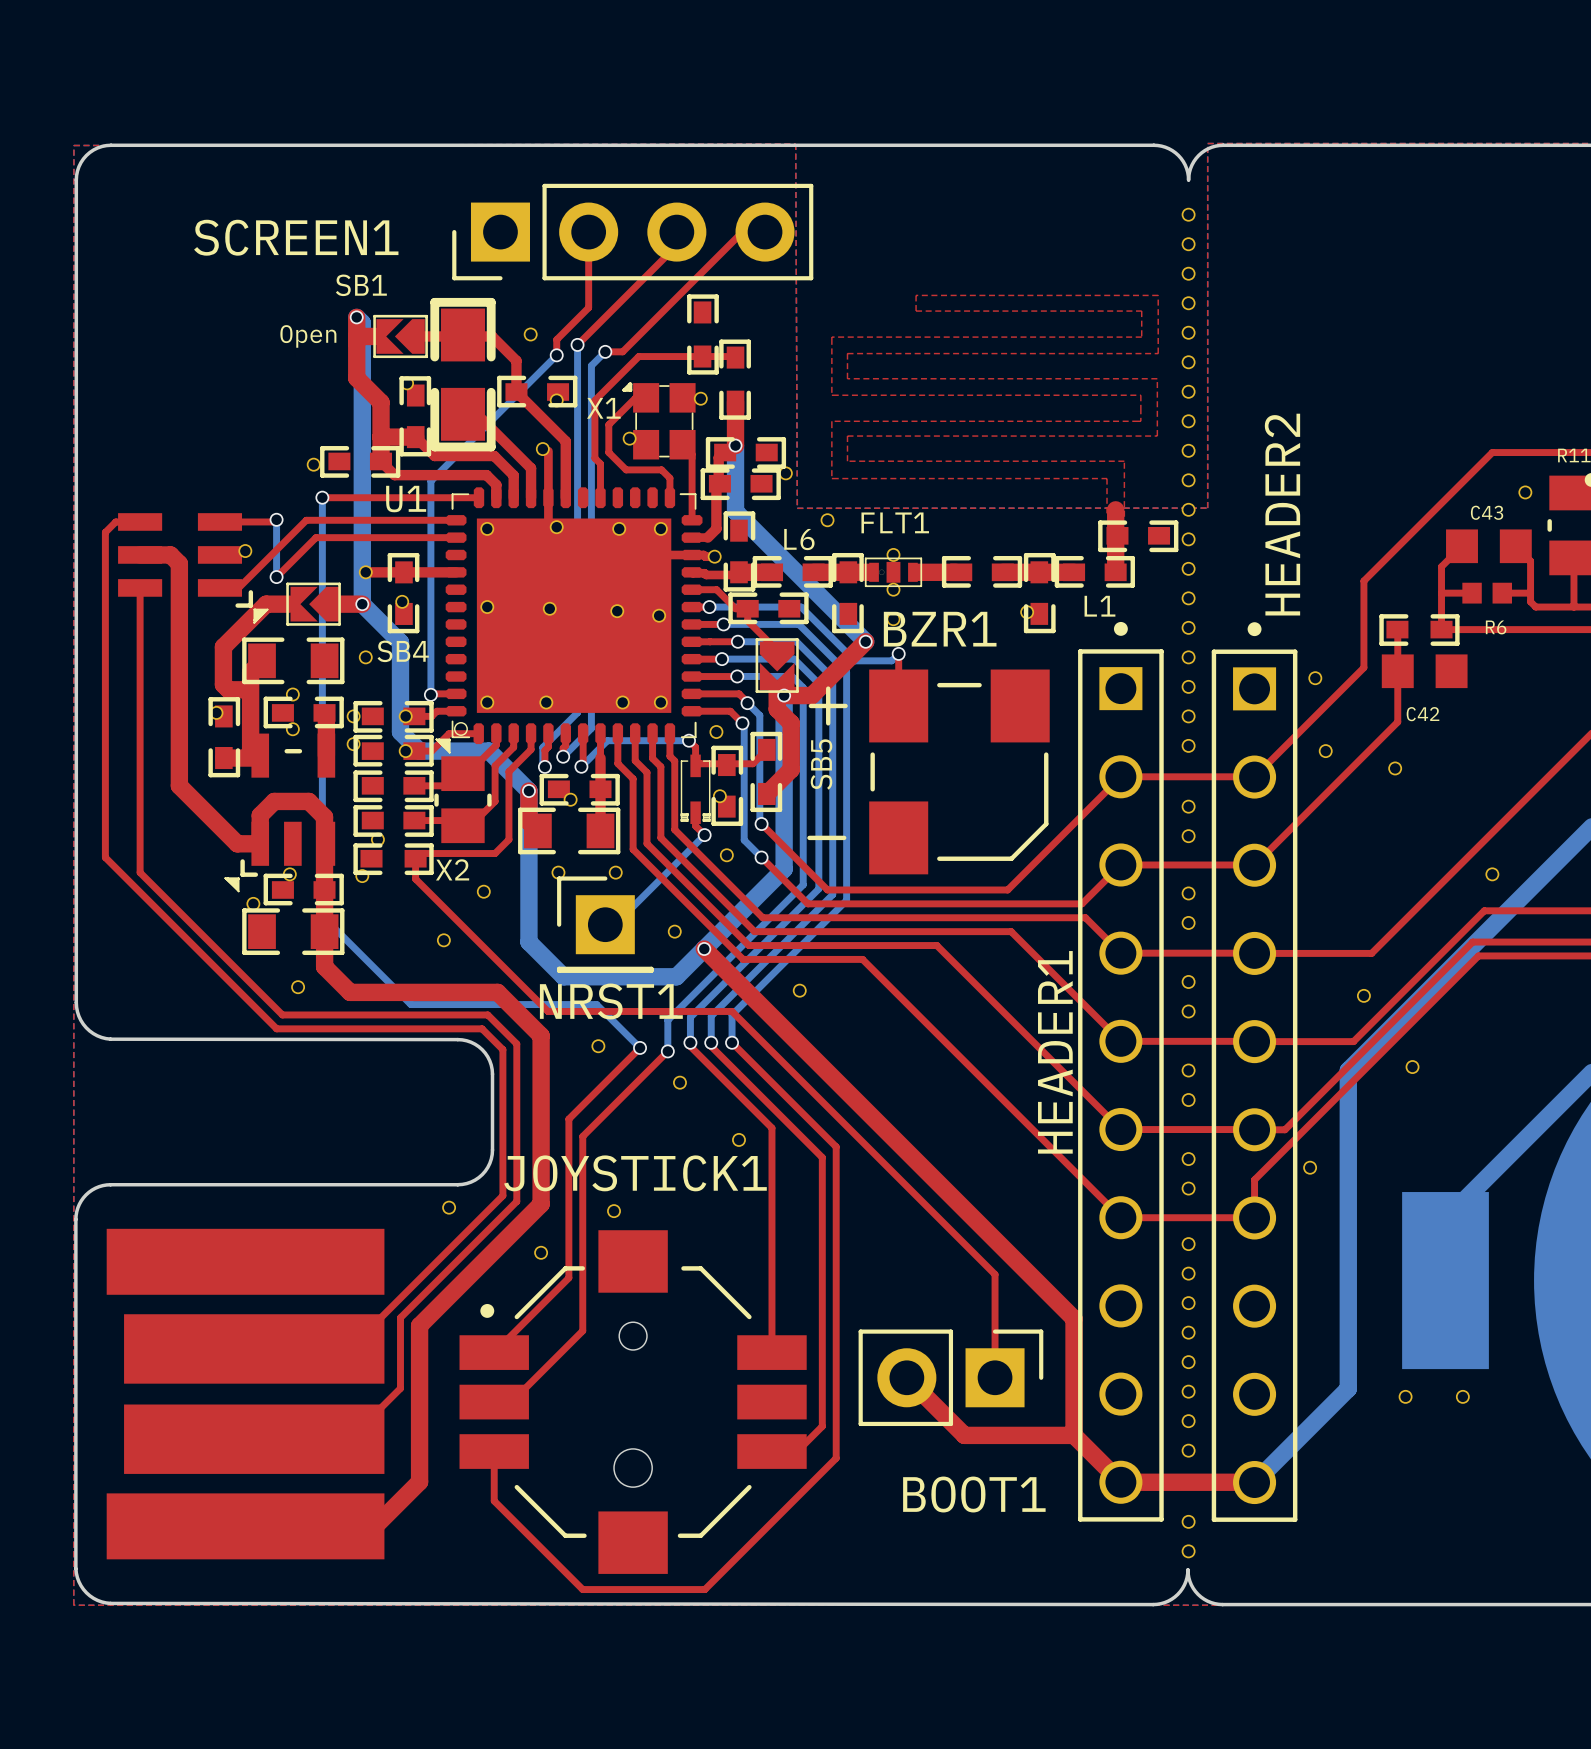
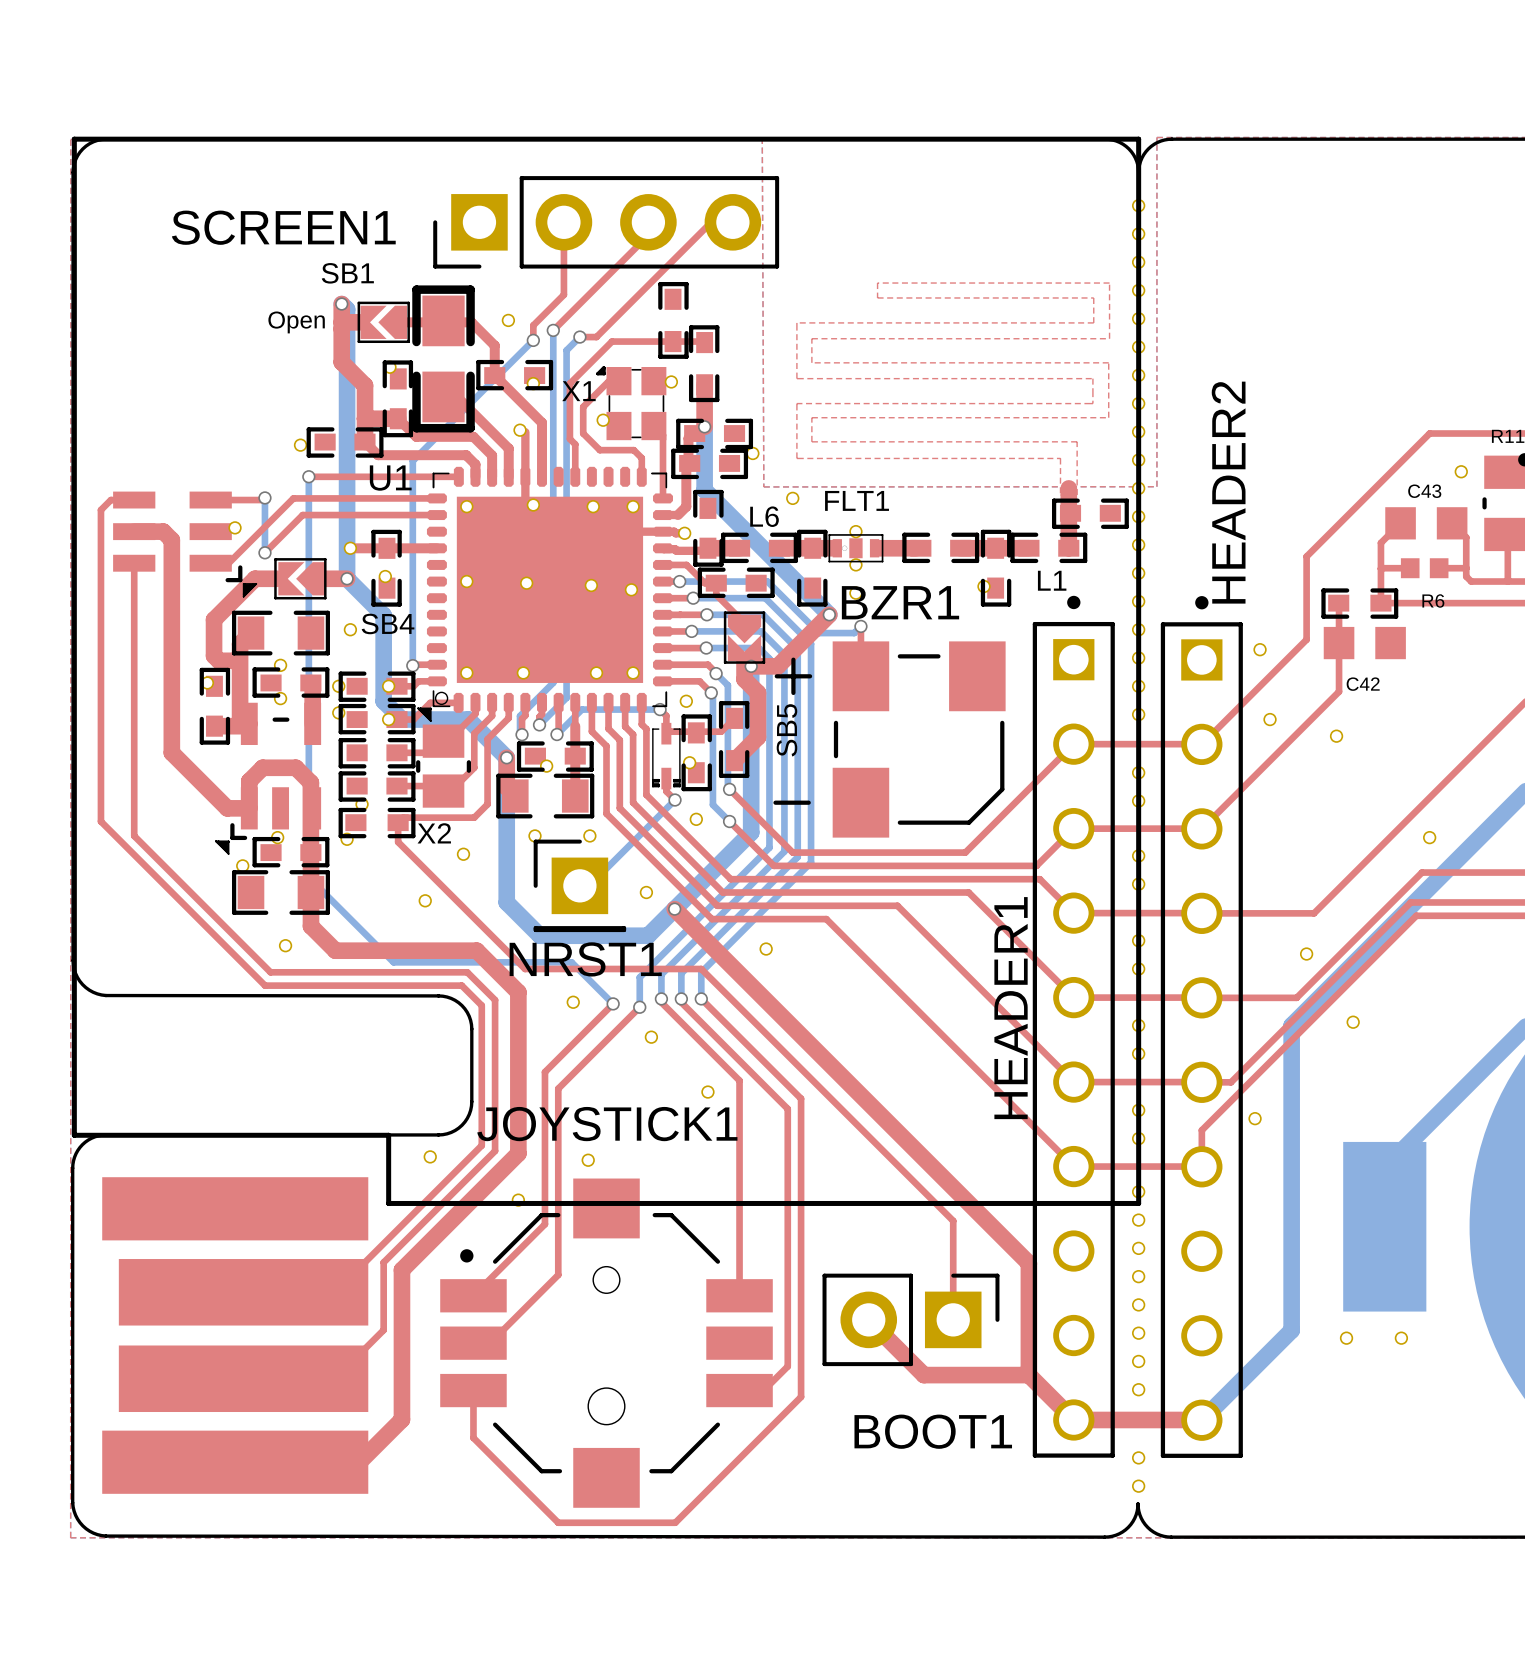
line: none -> (74, 139) (74, 1135) (388, 1135) (388, 1203) (1138, 1203) (1138, 139) (74, 139)

